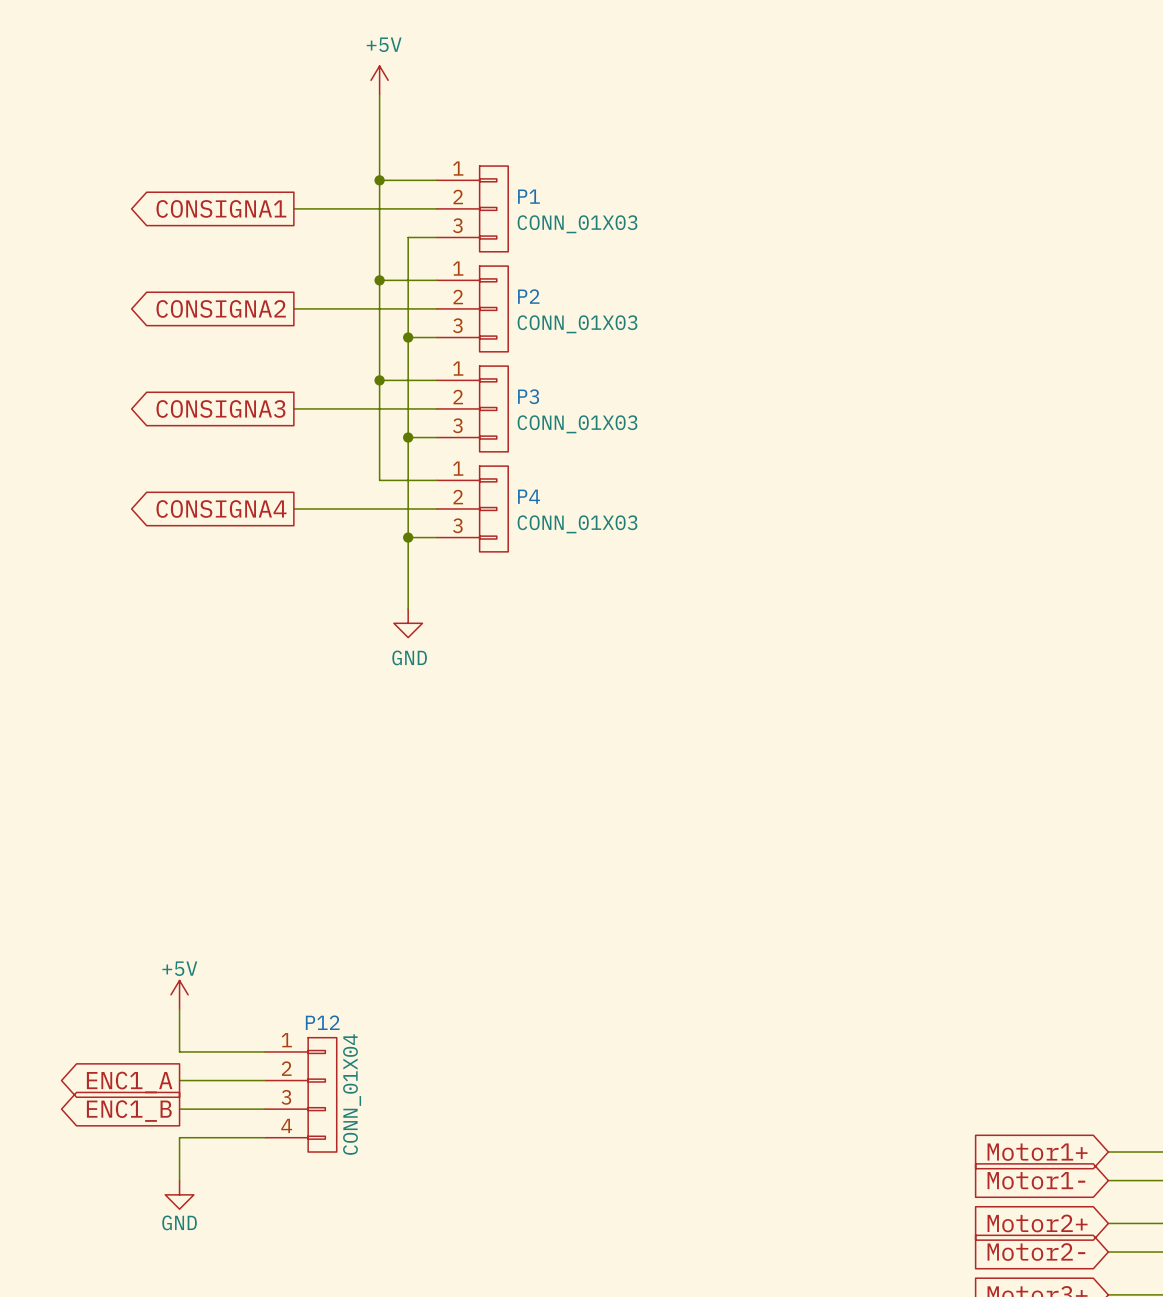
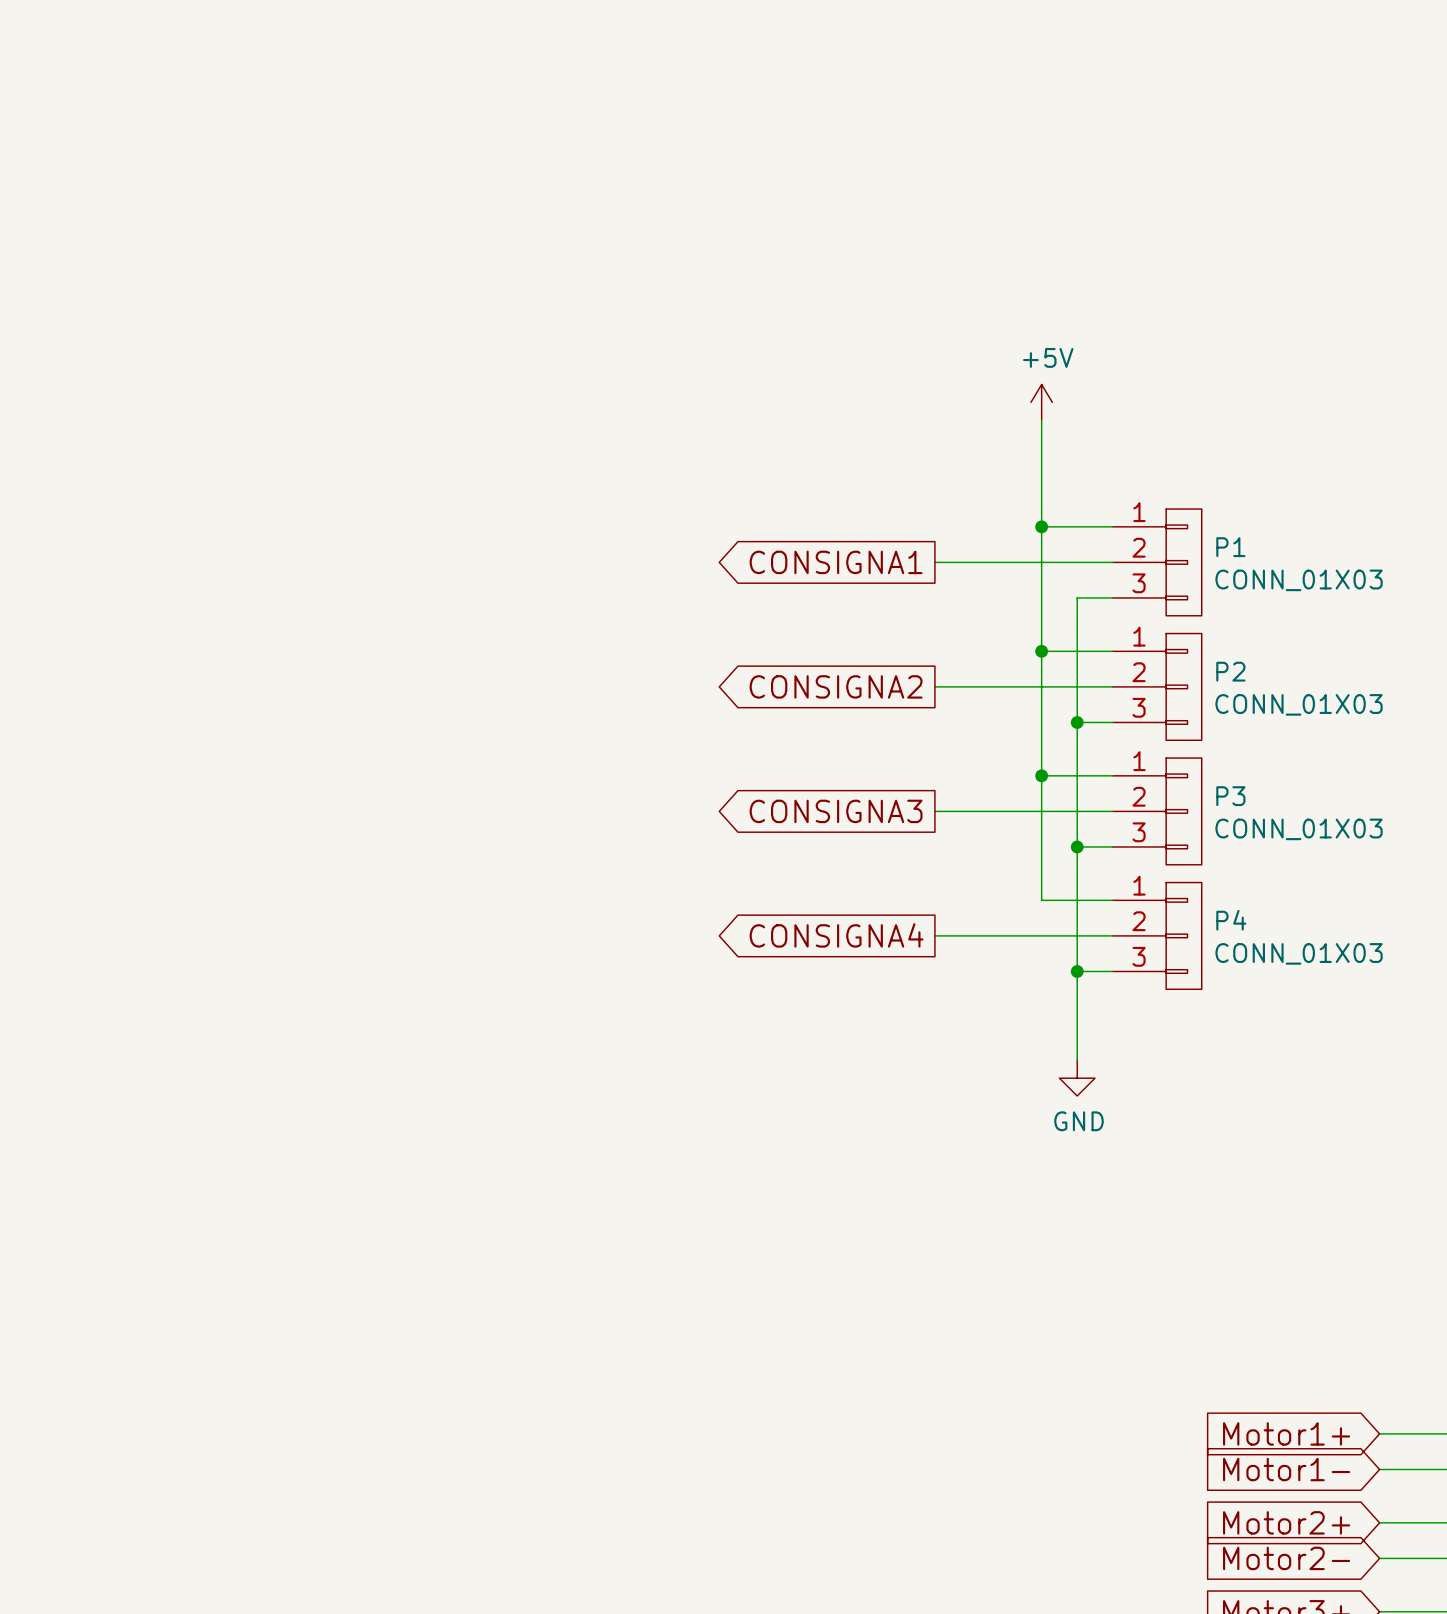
power symbol: +5V (379, 80) -> none
wire: (379, 94) (379, 480) (436, 480) -> none
wire: (379, 180) (436, 180) -> none
junction: (379, 180) -> none
global label: CONSIGNA1 (221, 208) -> none
wire: (293, 208) (436, 208) -> none
P1 position: (472, 208) -> (1157, 562)
wire: (436, 237) (408, 237) (408, 609) -> none
wire: (379, 280) (436, 280) -> none
junction: (379, 280) -> none
global label: CONSIGNA2 (221, 308) -> none
wire: (293, 308) (436, 308) -> none
P2 position: (472, 308) -> (1157, 686)
power symbol: none -> +5V (1041, 402)
wire: (408, 337) (436, 337) -> none
junction: (408, 337) -> none
wire: none -> (1041, 420) (1041, 900) (1112, 900)
wire: (379, 380) (436, 380) -> none
junction: (379, 380) -> none
global label: CONSIGNA3 (220, 408) -> none
wire: (293, 408) (436, 408) -> none
P3 position: (472, 408) -> (1157, 811)
wire: none -> (1041, 526) (1112, 526)
junction: none -> (1041, 526)
wire: (408, 437) (436, 437) -> none
junction: (408, 437) -> none
global label: none -> CONSIGNA1 (836, 562)
wire: none -> (934, 562) (1112, 562)
wire: none -> (1112, 597) (1077, 597) (1077, 1060)
global label: CONSIGNA4 (221, 508) -> none
wire: (293, 508) (436, 508) -> none
P4 position: (472, 508) -> (1157, 935)
wire: none -> (1041, 651) (1112, 651)
junction: none -> (1041, 651)
wire: (408, 537) (436, 537) -> none
junction: (408, 537) -> none
global label: none -> CONSIGNA2 (836, 686)
wire: none -> (934, 686) (1112, 686)
wire: none -> (1077, 722) (1112, 722)
junction: none -> (1077, 722)
power symbol: GND (408, 623) -> none
wire: none -> (1041, 775) (1112, 775)
junction: none -> (1041, 775)
global label: none -> CONSIGNA3 (836, 811)
wire: none -> (934, 811) (1112, 811)
wire: none -> (1077, 846) (1112, 846)
junction: none -> (1077, 846)
global label: none -> CONSIGNA4 (836, 935)
wire: none -> (934, 935) (1112, 935)
wire: none -> (1077, 971) (1112, 971)
junction: none -> (1077, 971)
power symbol: none -> GND (1077, 1078)
power symbol: +5V (179, 994) -> none
wire: (179, 1009) (179, 1051) (265, 1051) -> none
wire: (179, 1080) (265, 1080) -> none
global label: ENC1_A (129, 1082) -> none
P12: CONN_01X04 (301, 1094) -> none
wire: (179, 1109) (265, 1109) -> none
global label: ENC1_B (129, 1111) -> none
wire: (265, 1137) (179, 1137) (179, 1180) -> none
power symbol: GND (179, 1194) -> none

